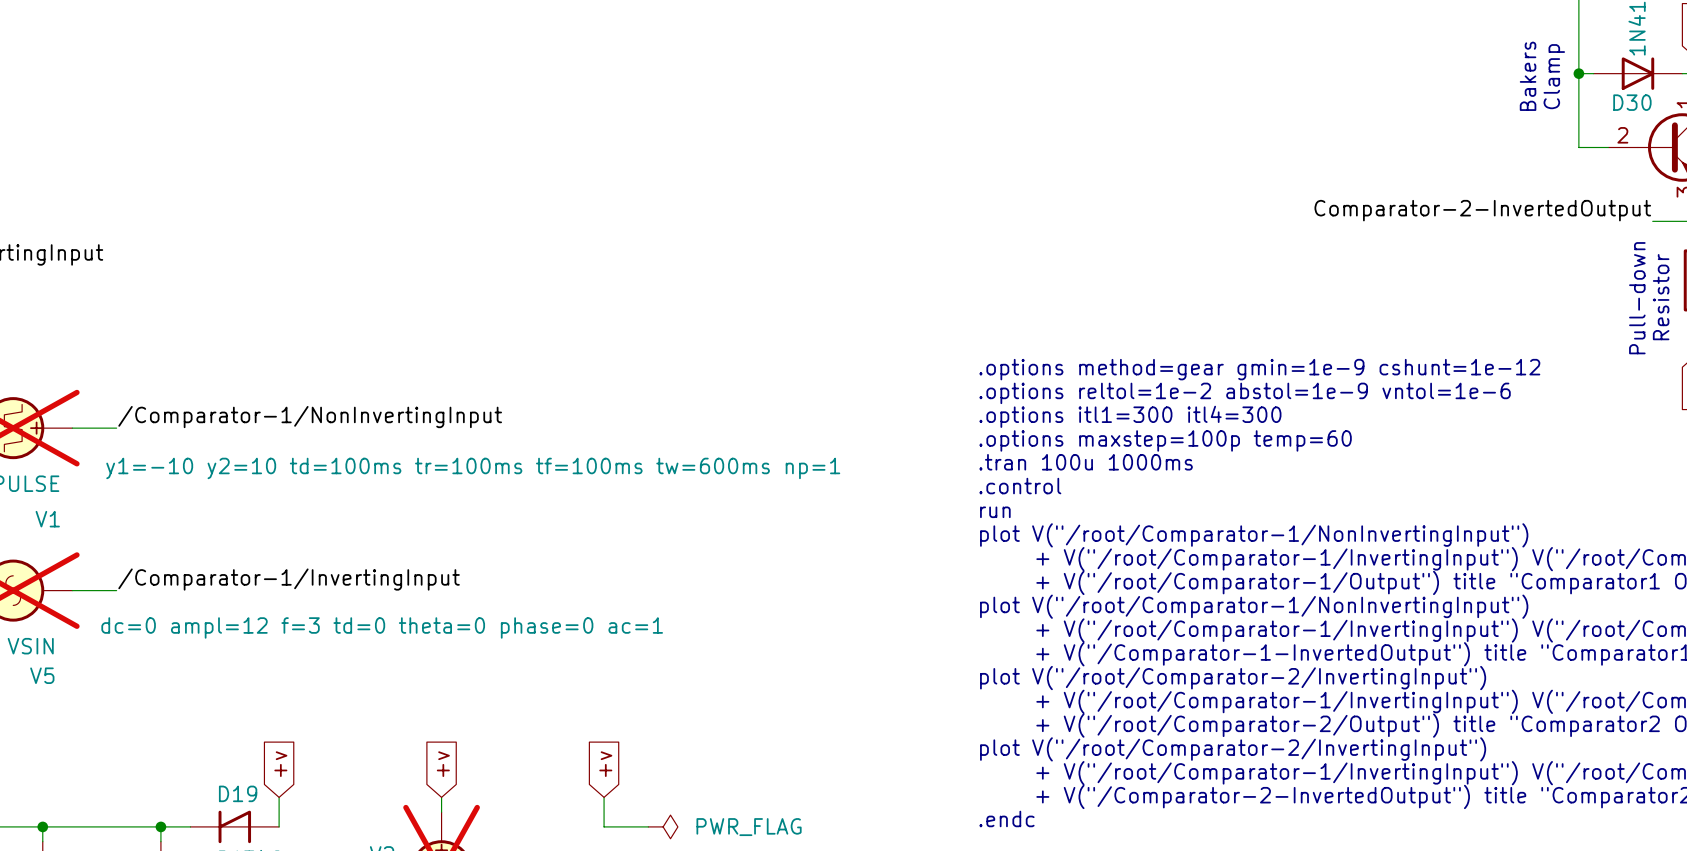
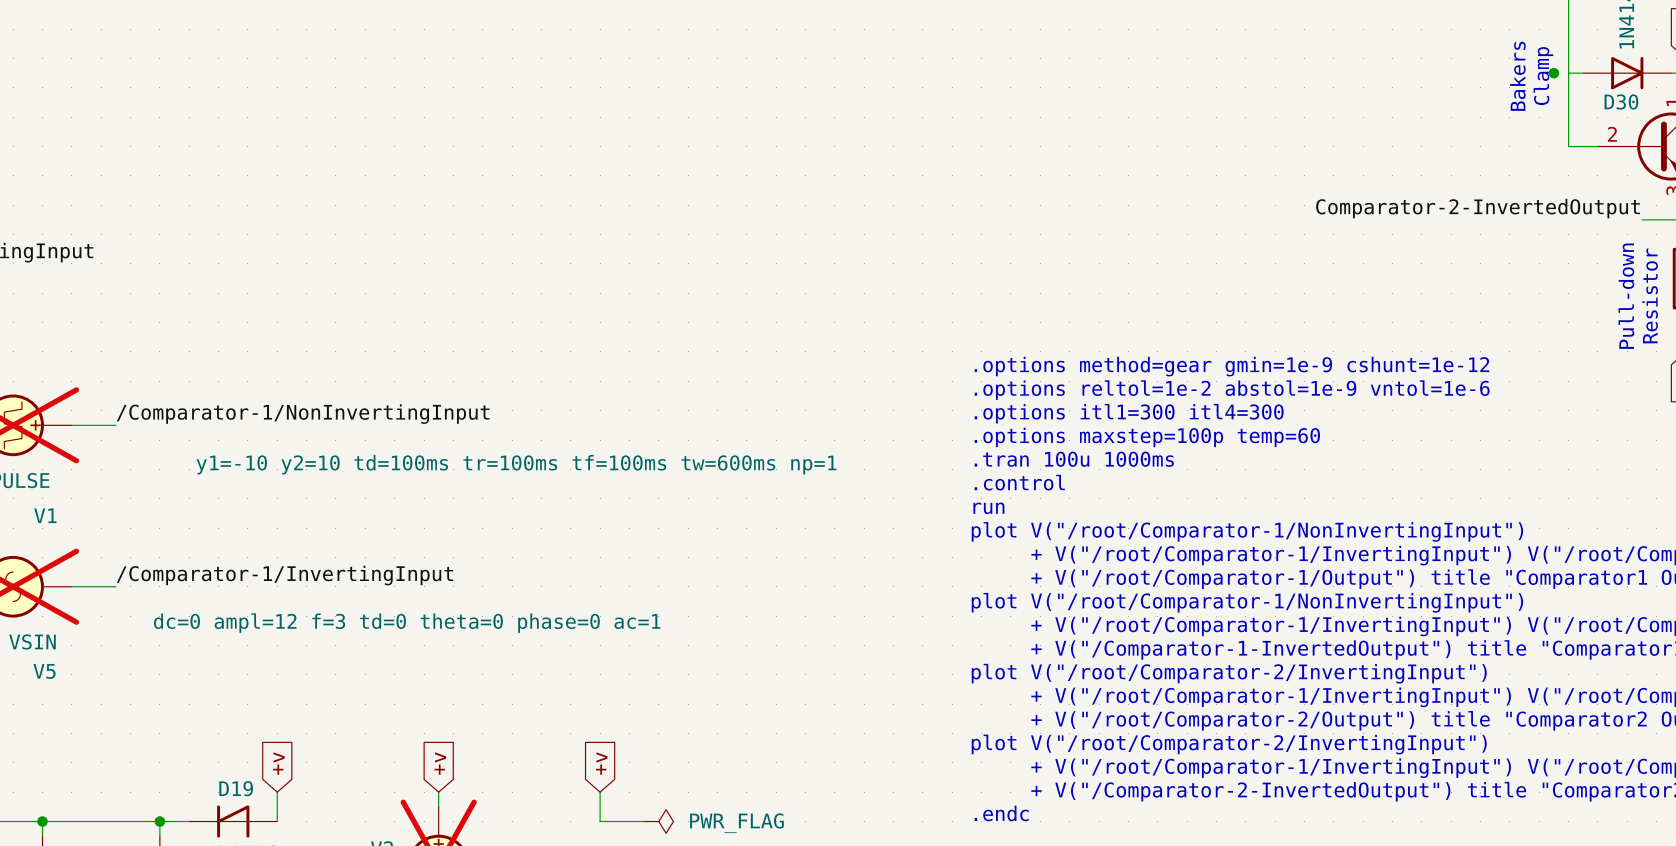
junction position: (1578, 73) -> (1553, 73)

